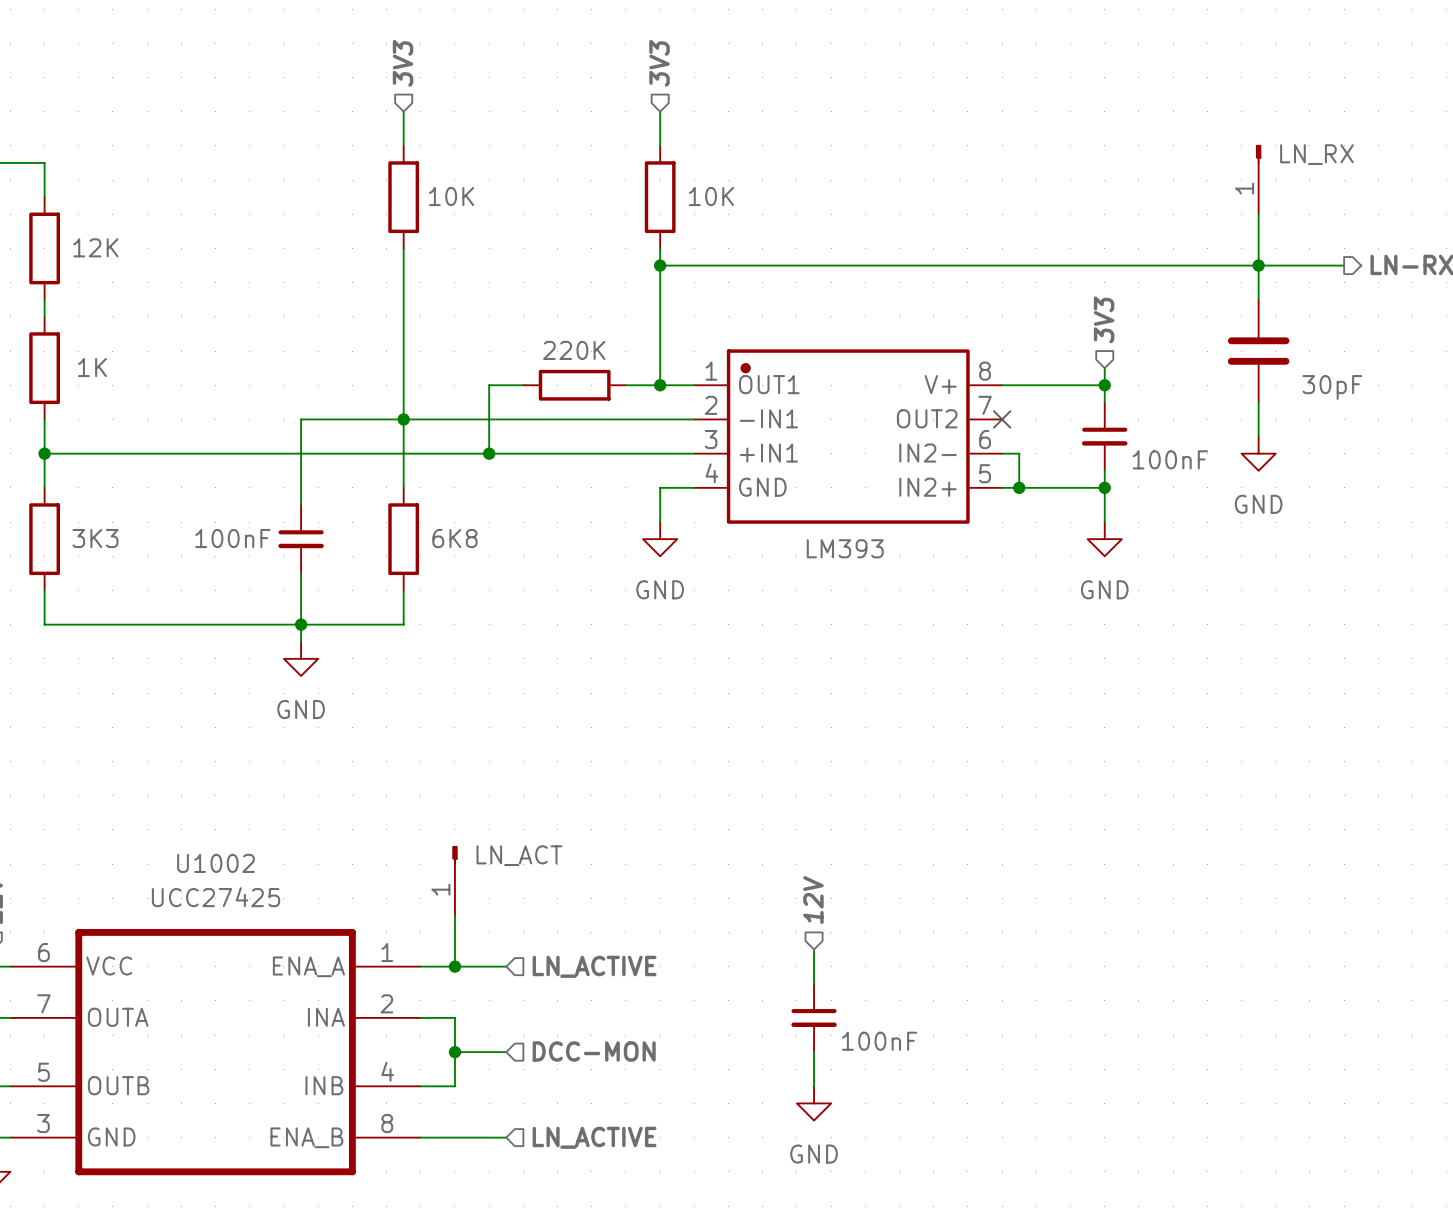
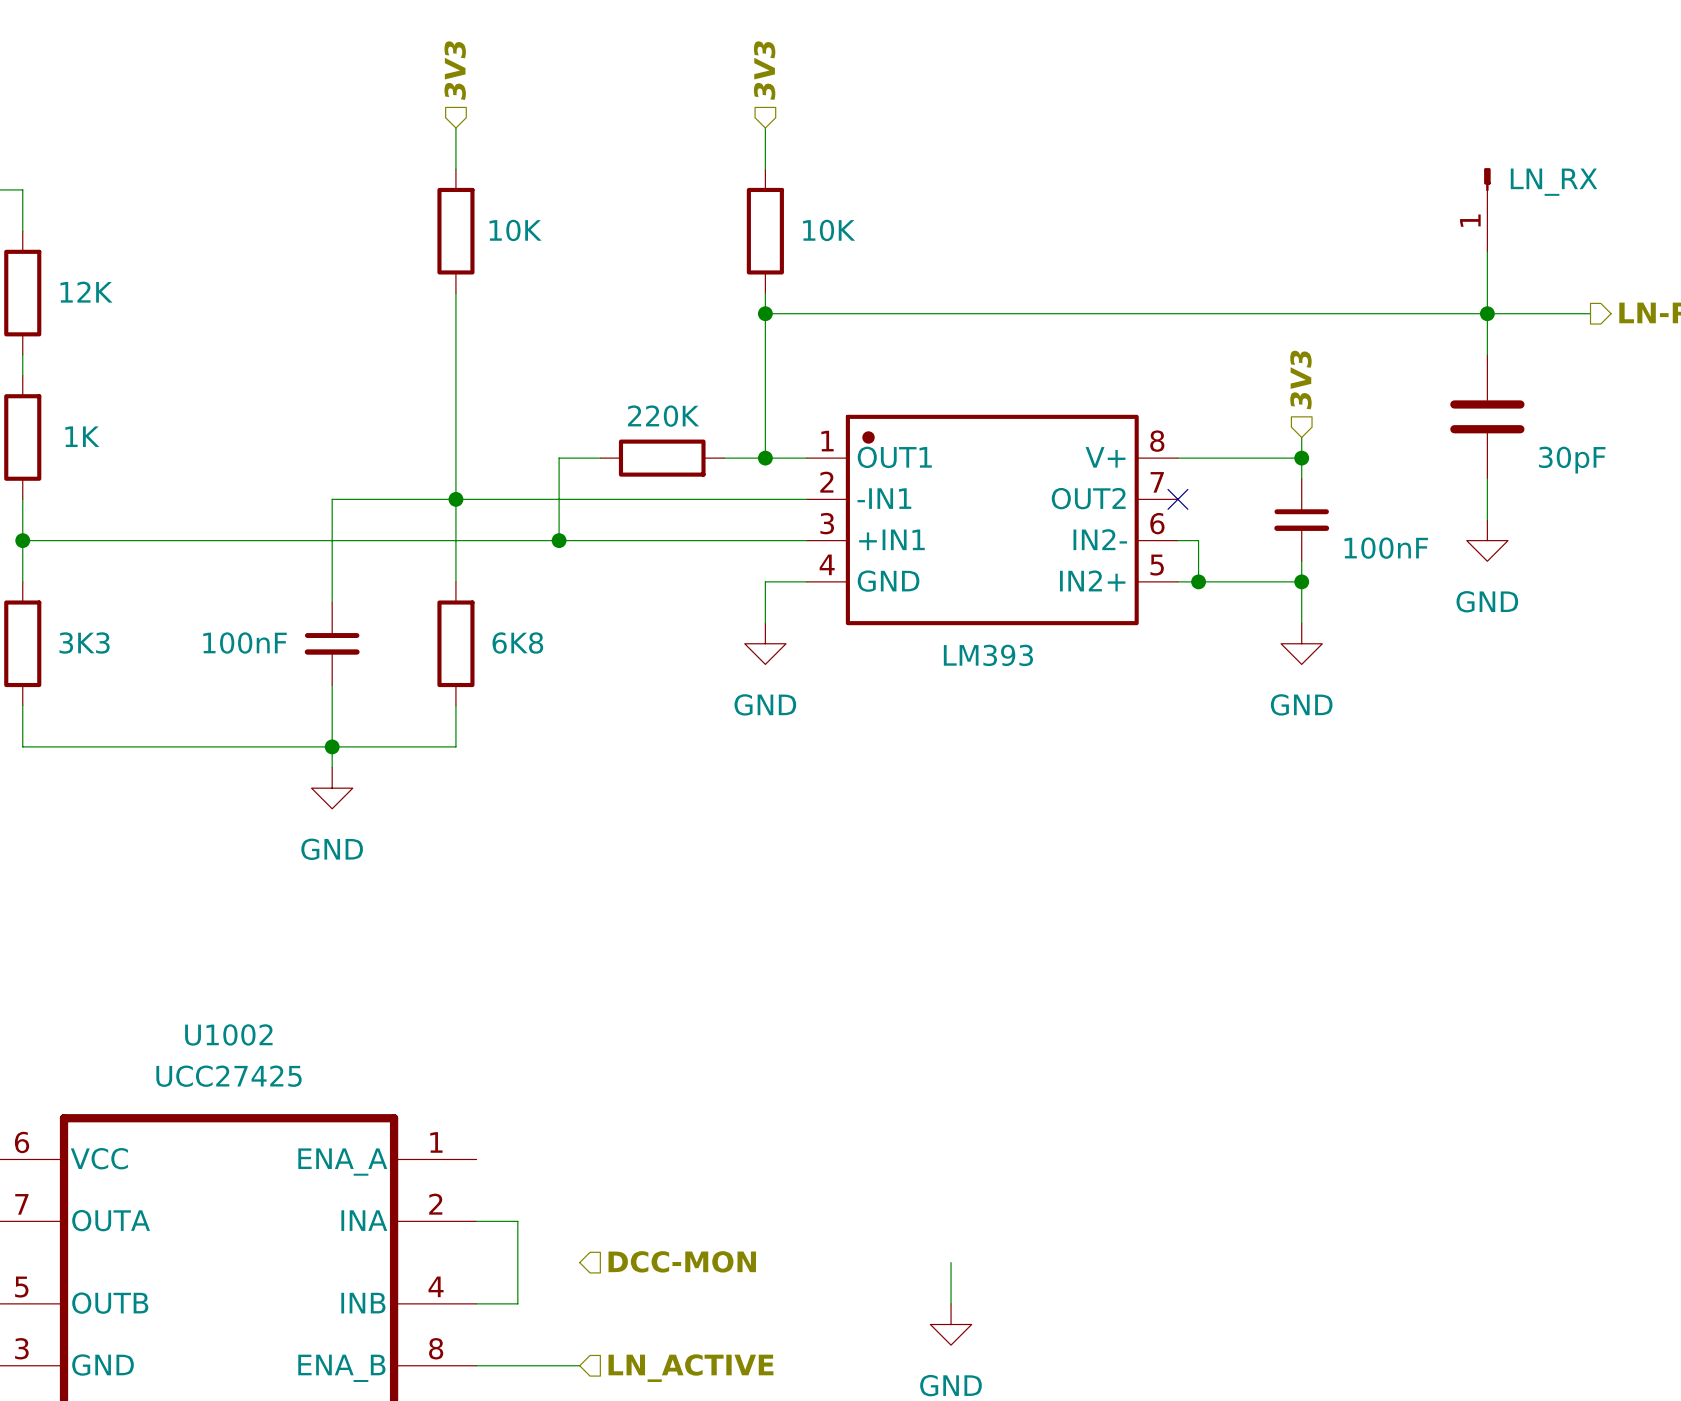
part: LN_ACT (454, 880) -> none
hierarchical label: 12V (813, 900) -> none
wire: (454, 915) (454, 966) -> none
wire: (814, 949) (814, 983) -> none
wire: (420, 966) (506, 966) -> none
junction: (454, 966) -> none
hierarchical label: LN_ACTIVE (594, 966) -> none
part: 100nF (814, 1017) -> none
wire: (454, 1052) (506, 1052) -> none
junction: (454, 1052) -> none

